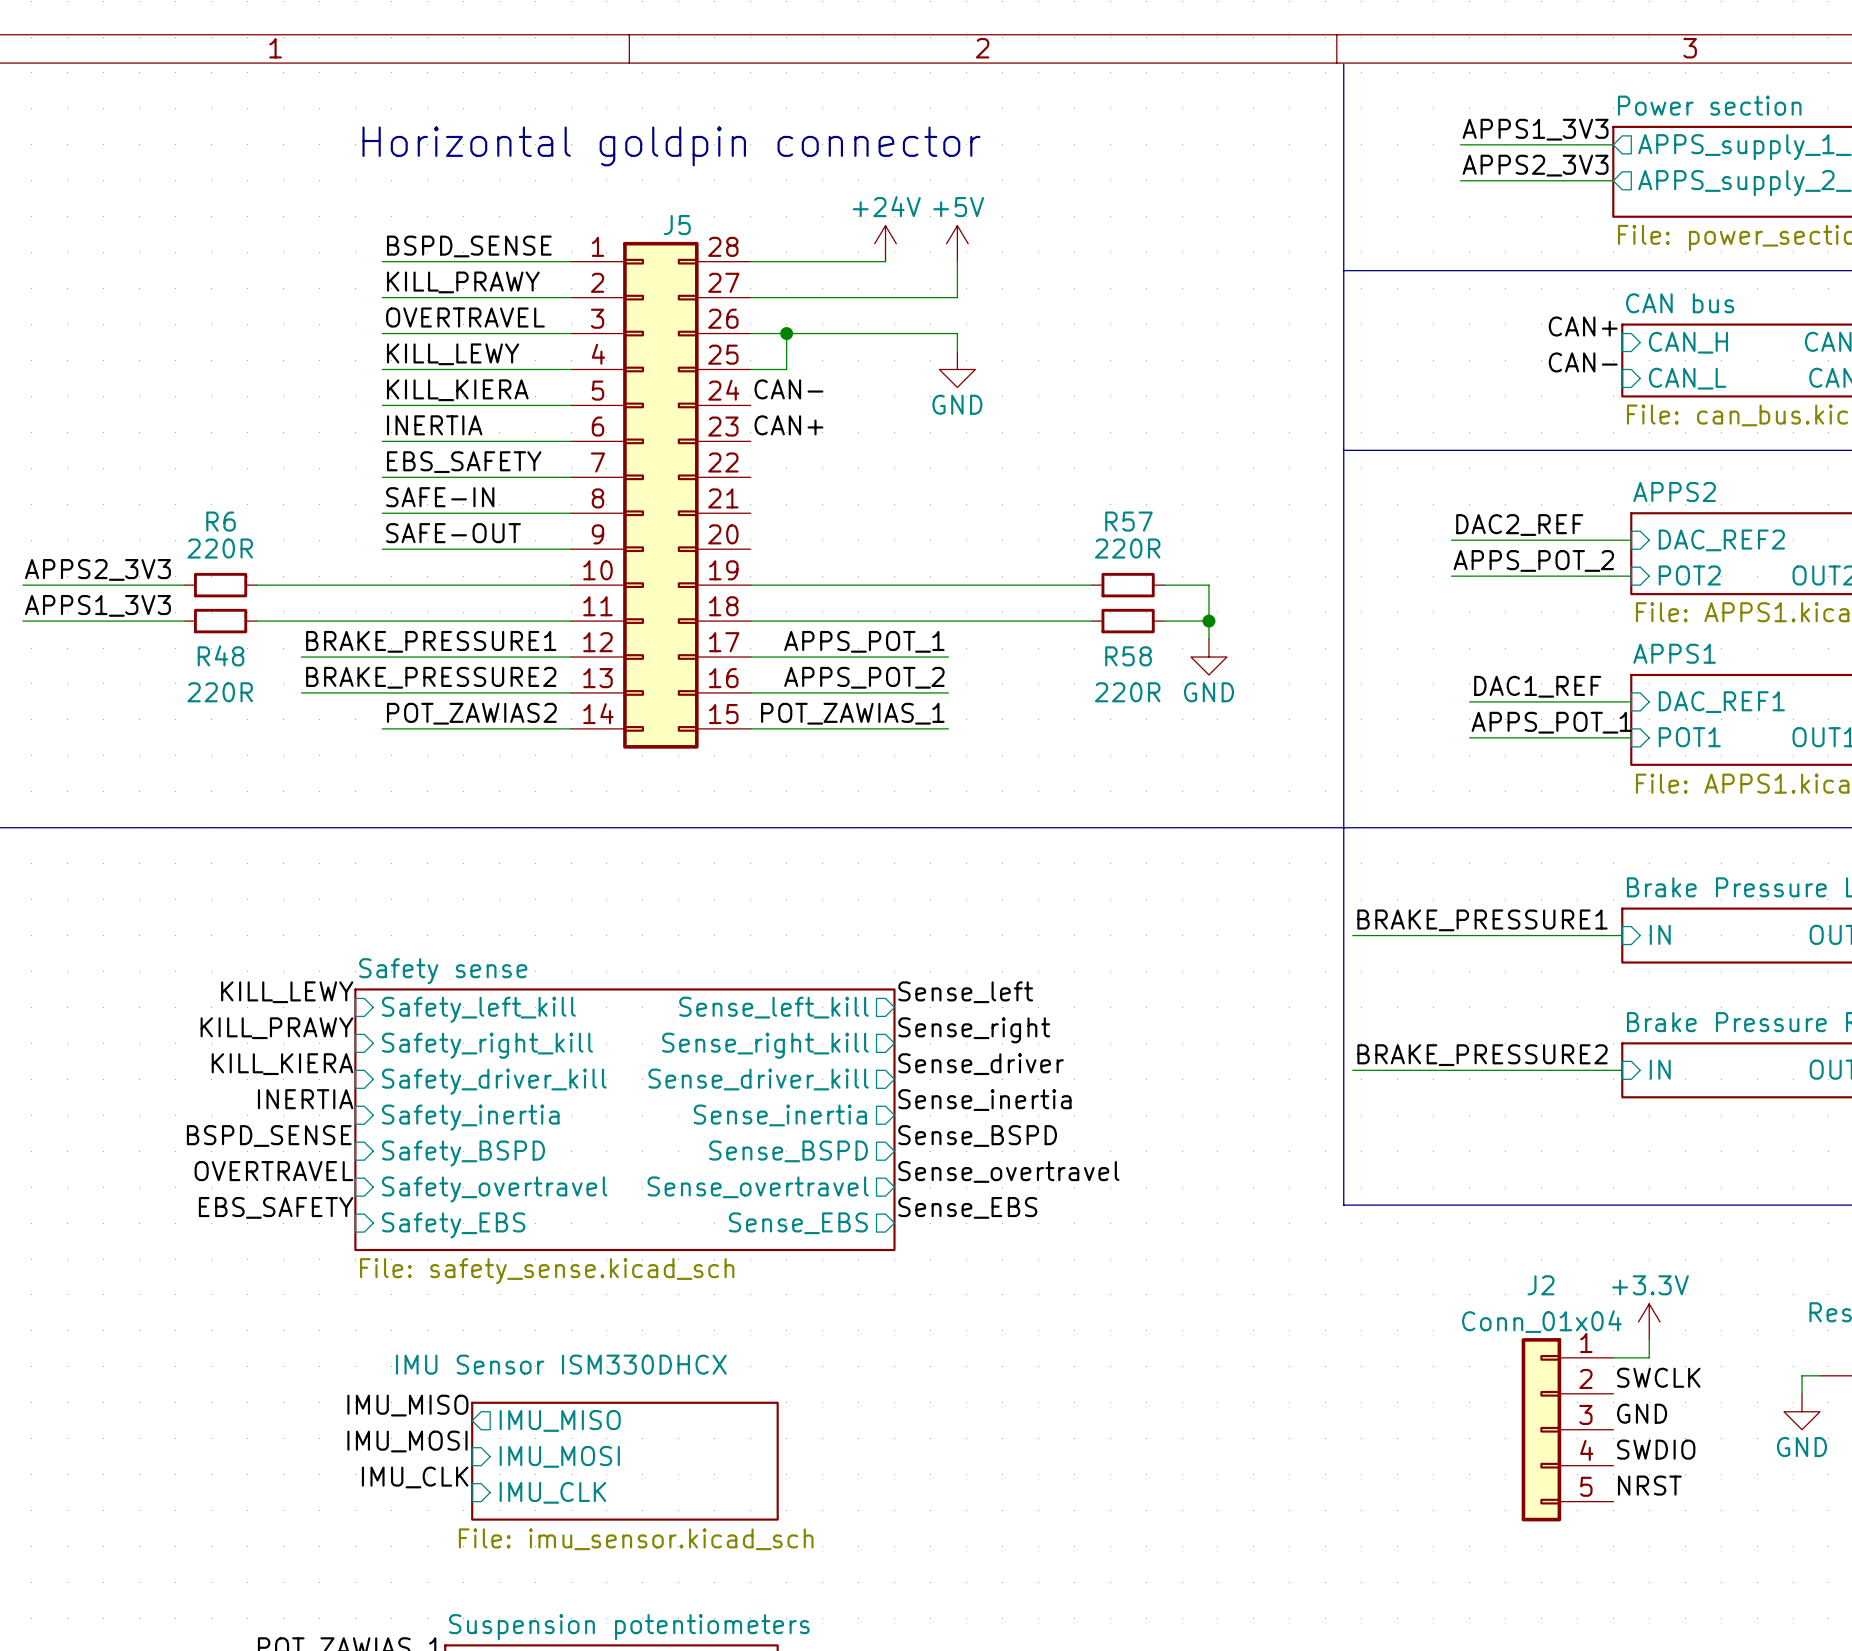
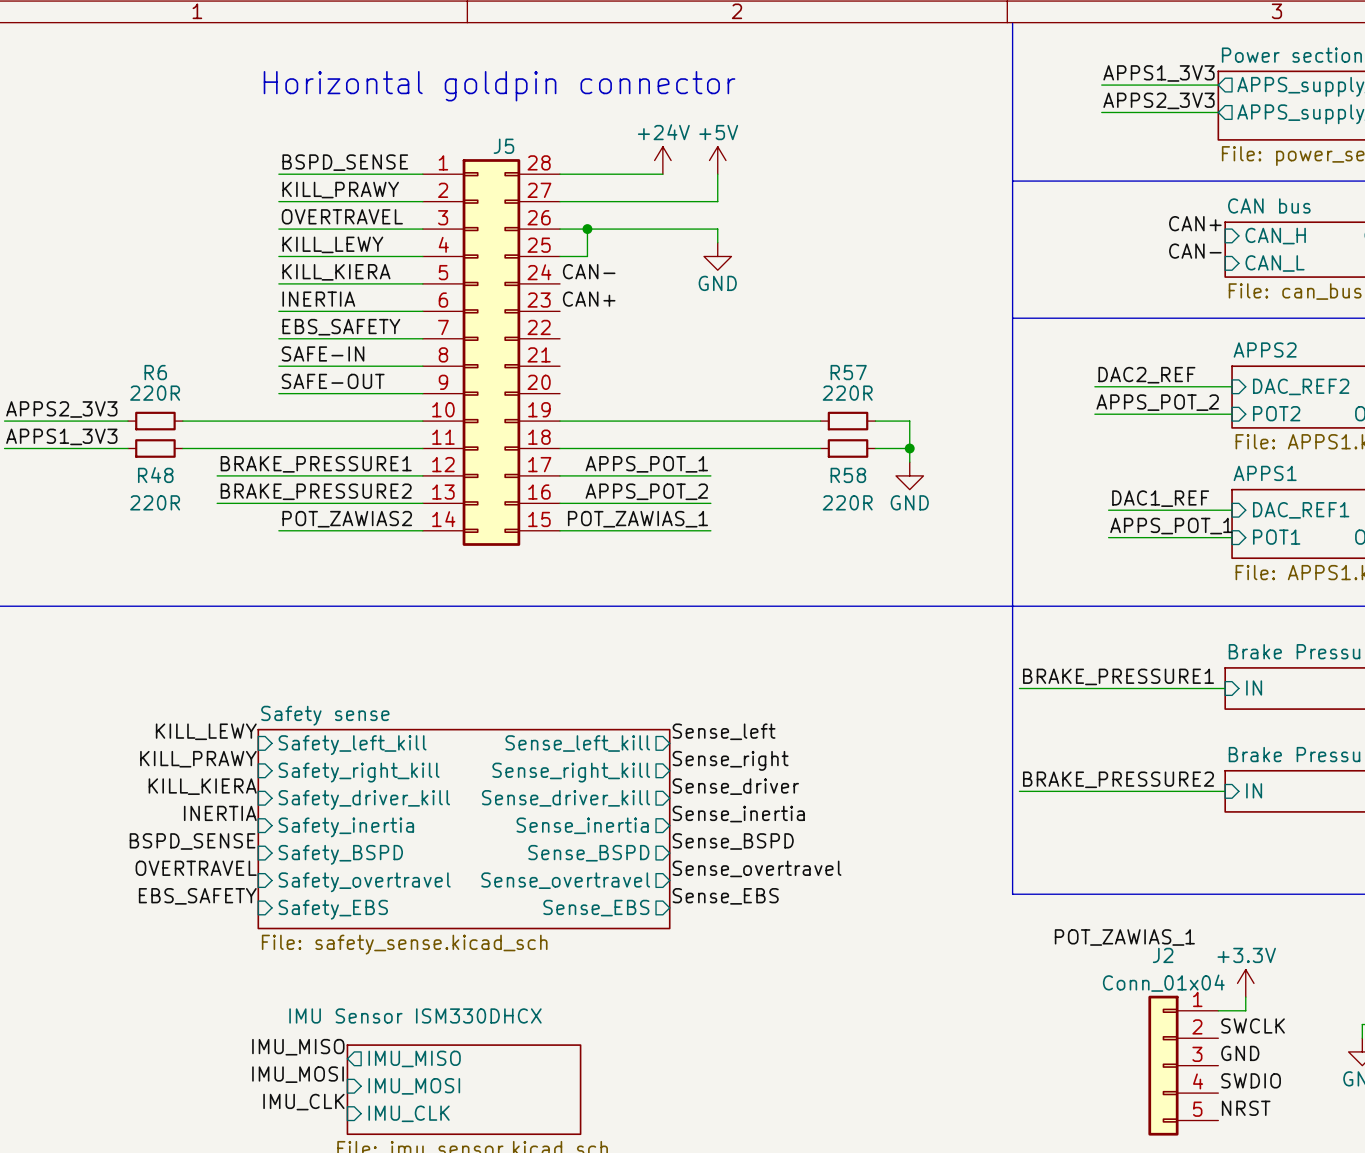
label: none -> POT_ZAWIAS_1 (1124, 937)

